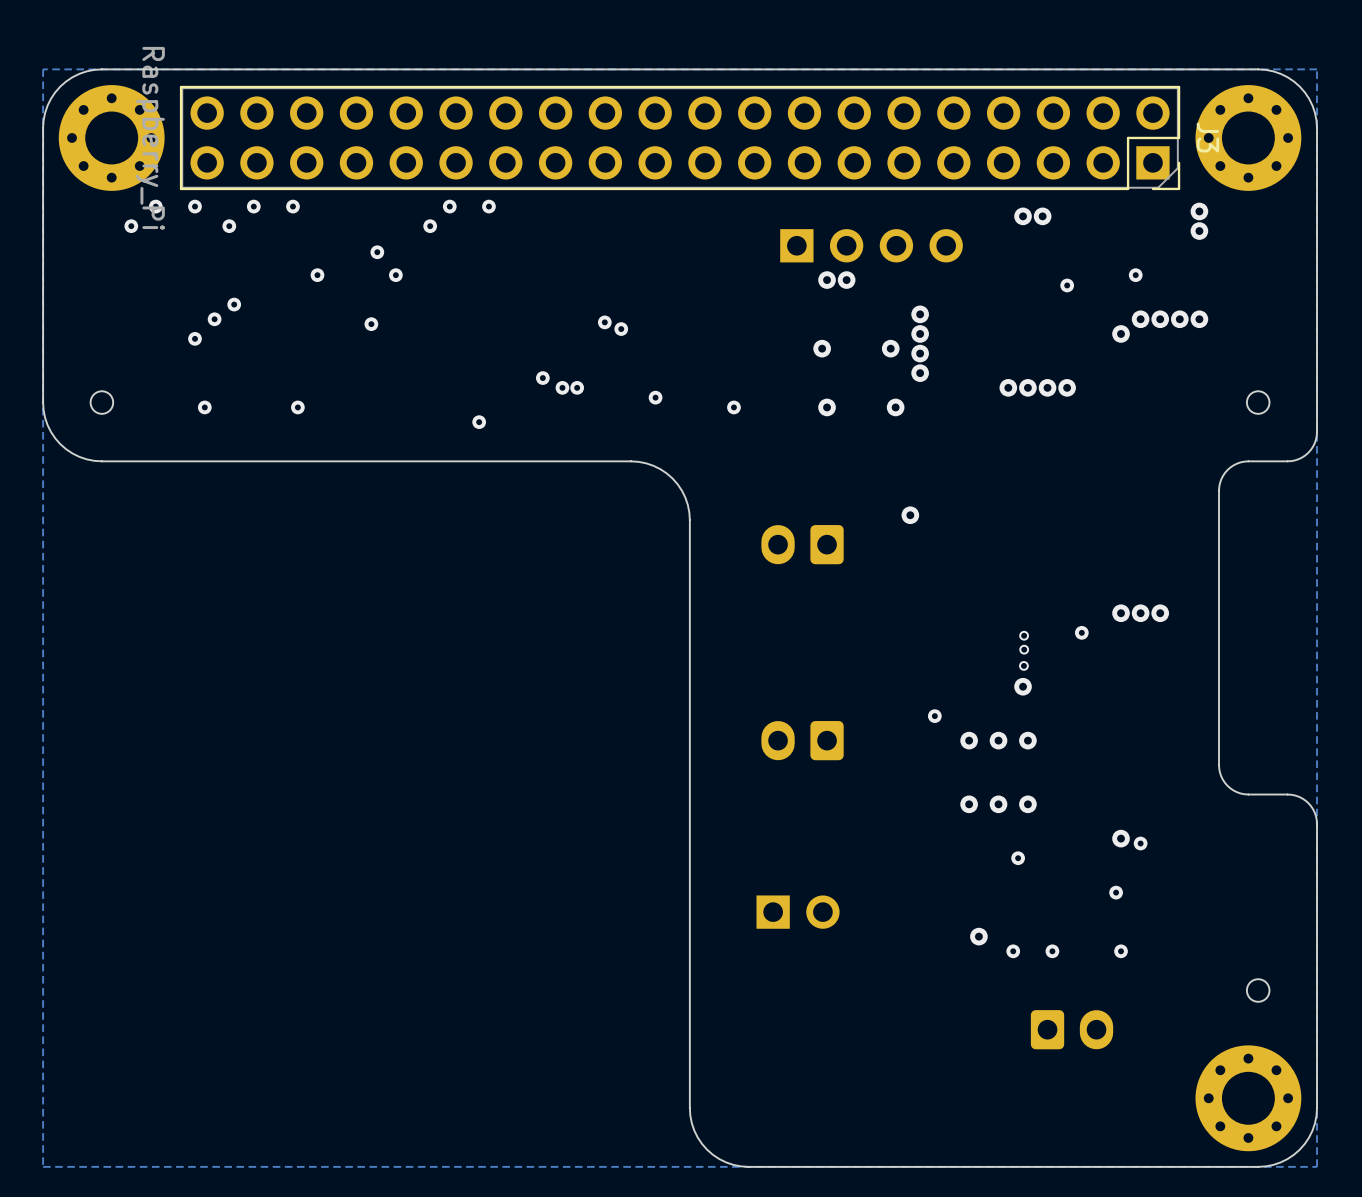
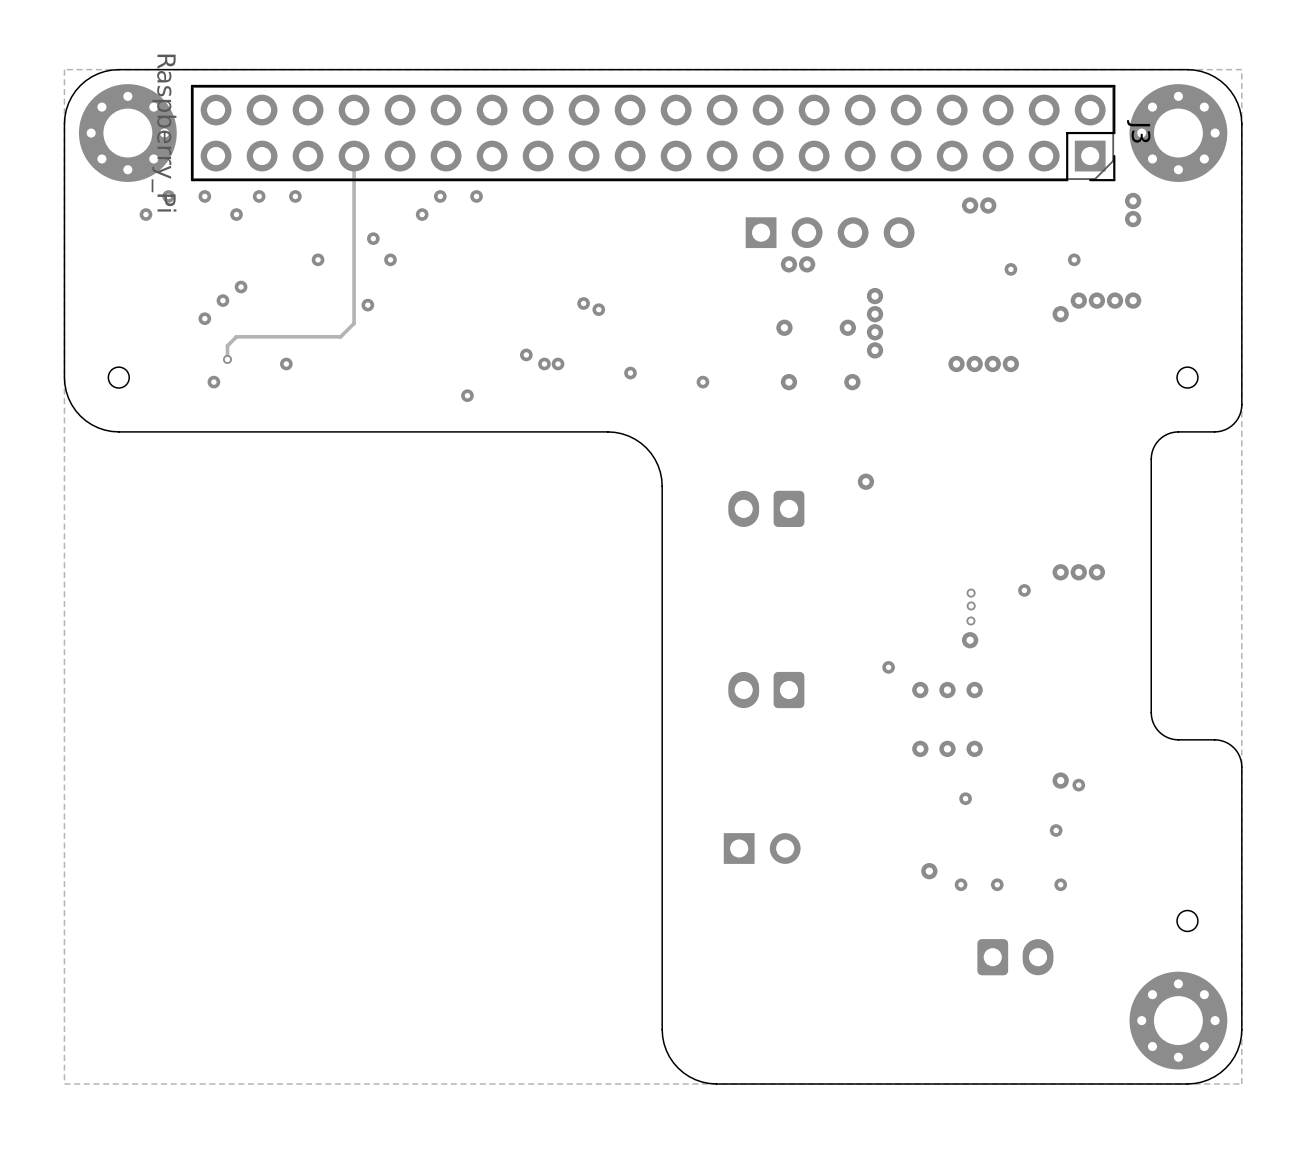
track: none -> (354, 156) (354, 323) (340, 336) (236, 336) (227, 345) (227, 359)
via: none -> (227, 359)
via position: (297, 407) -> (286, 363)

